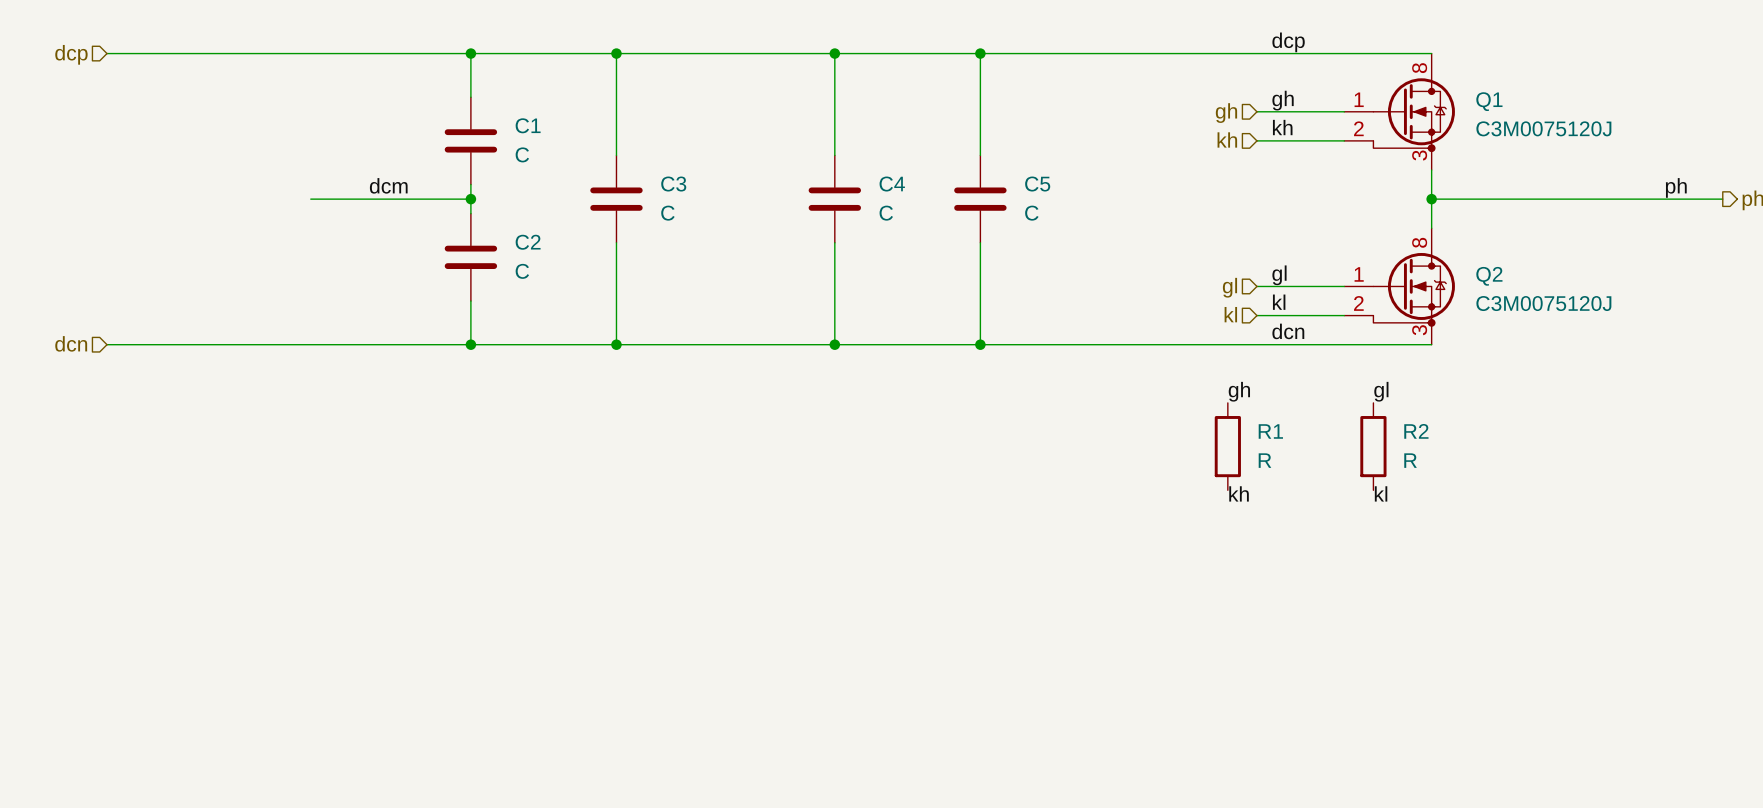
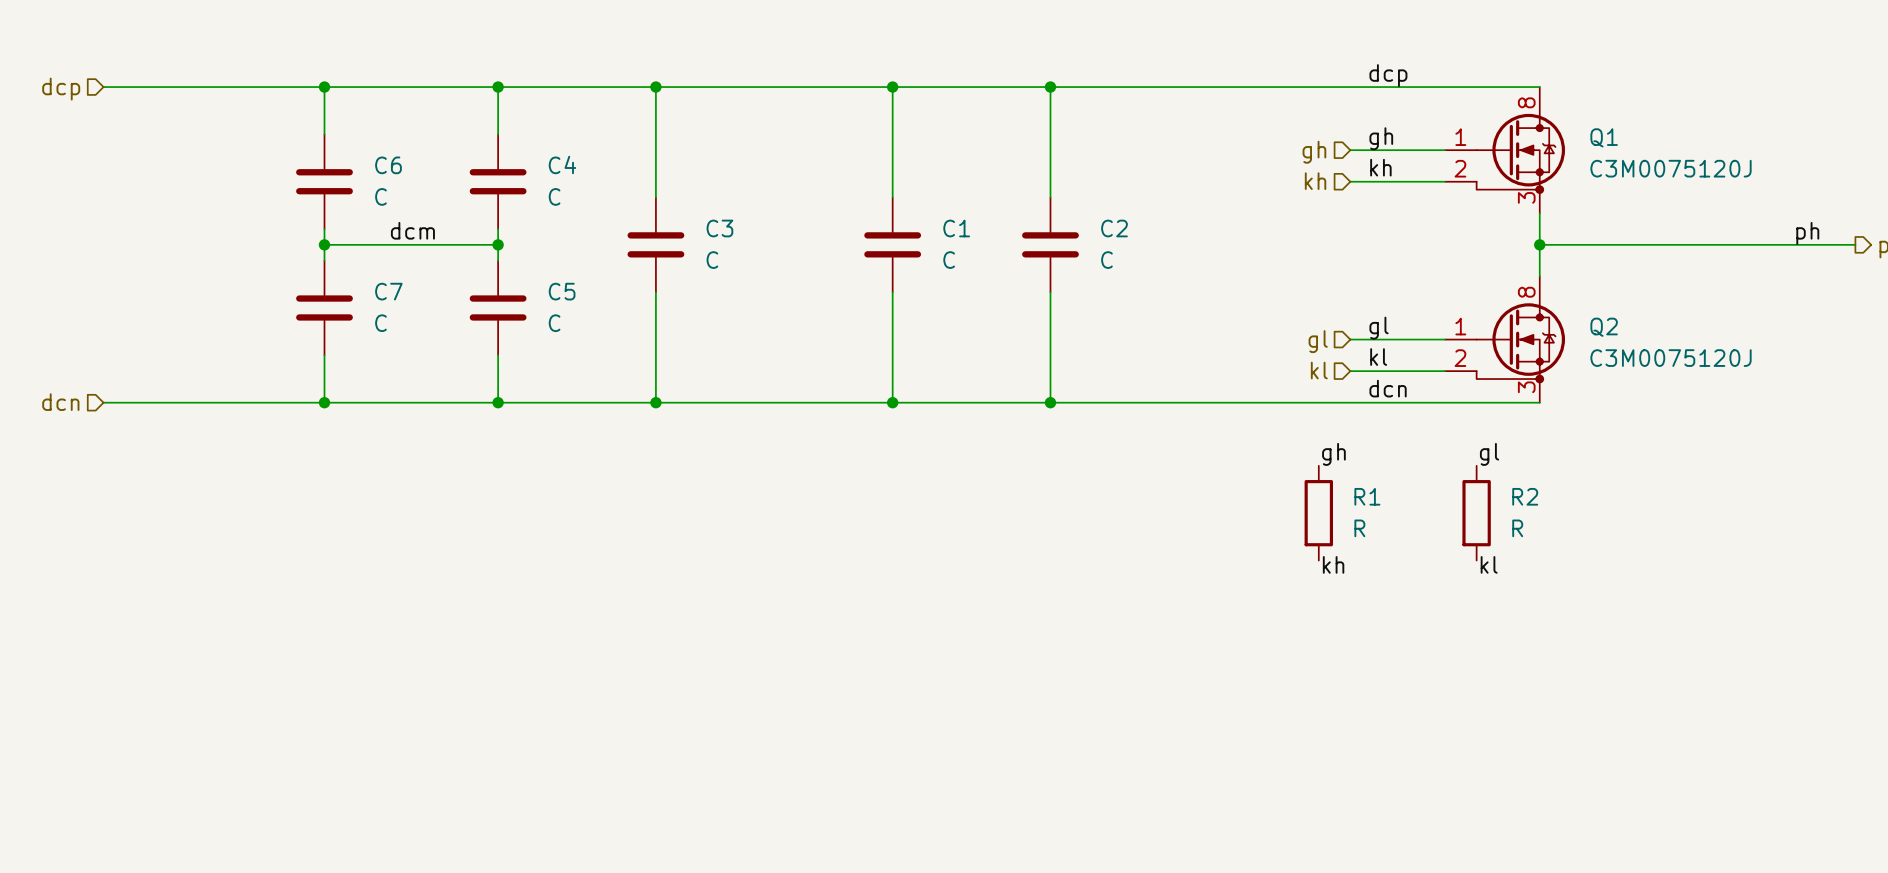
wire: none -> (324, 87) (324, 134)
junction: none -> (324, 87)
C1 name: C1 (528, 125) -> C4 (562, 164)
C6: none -> C (324, 181)
wire: none -> (324, 229) (324, 260)
C4 name: C4 (892, 184) -> C1 (956, 228)
C5 name: C5 (1037, 184) -> C2 (1114, 228)
junction: none -> (324, 244)
C2 name: C2 (528, 242) -> C5 (562, 291)
C7: none -> C (324, 308)
wire: none -> (324, 355) (324, 402)
junction: none -> (324, 402)

